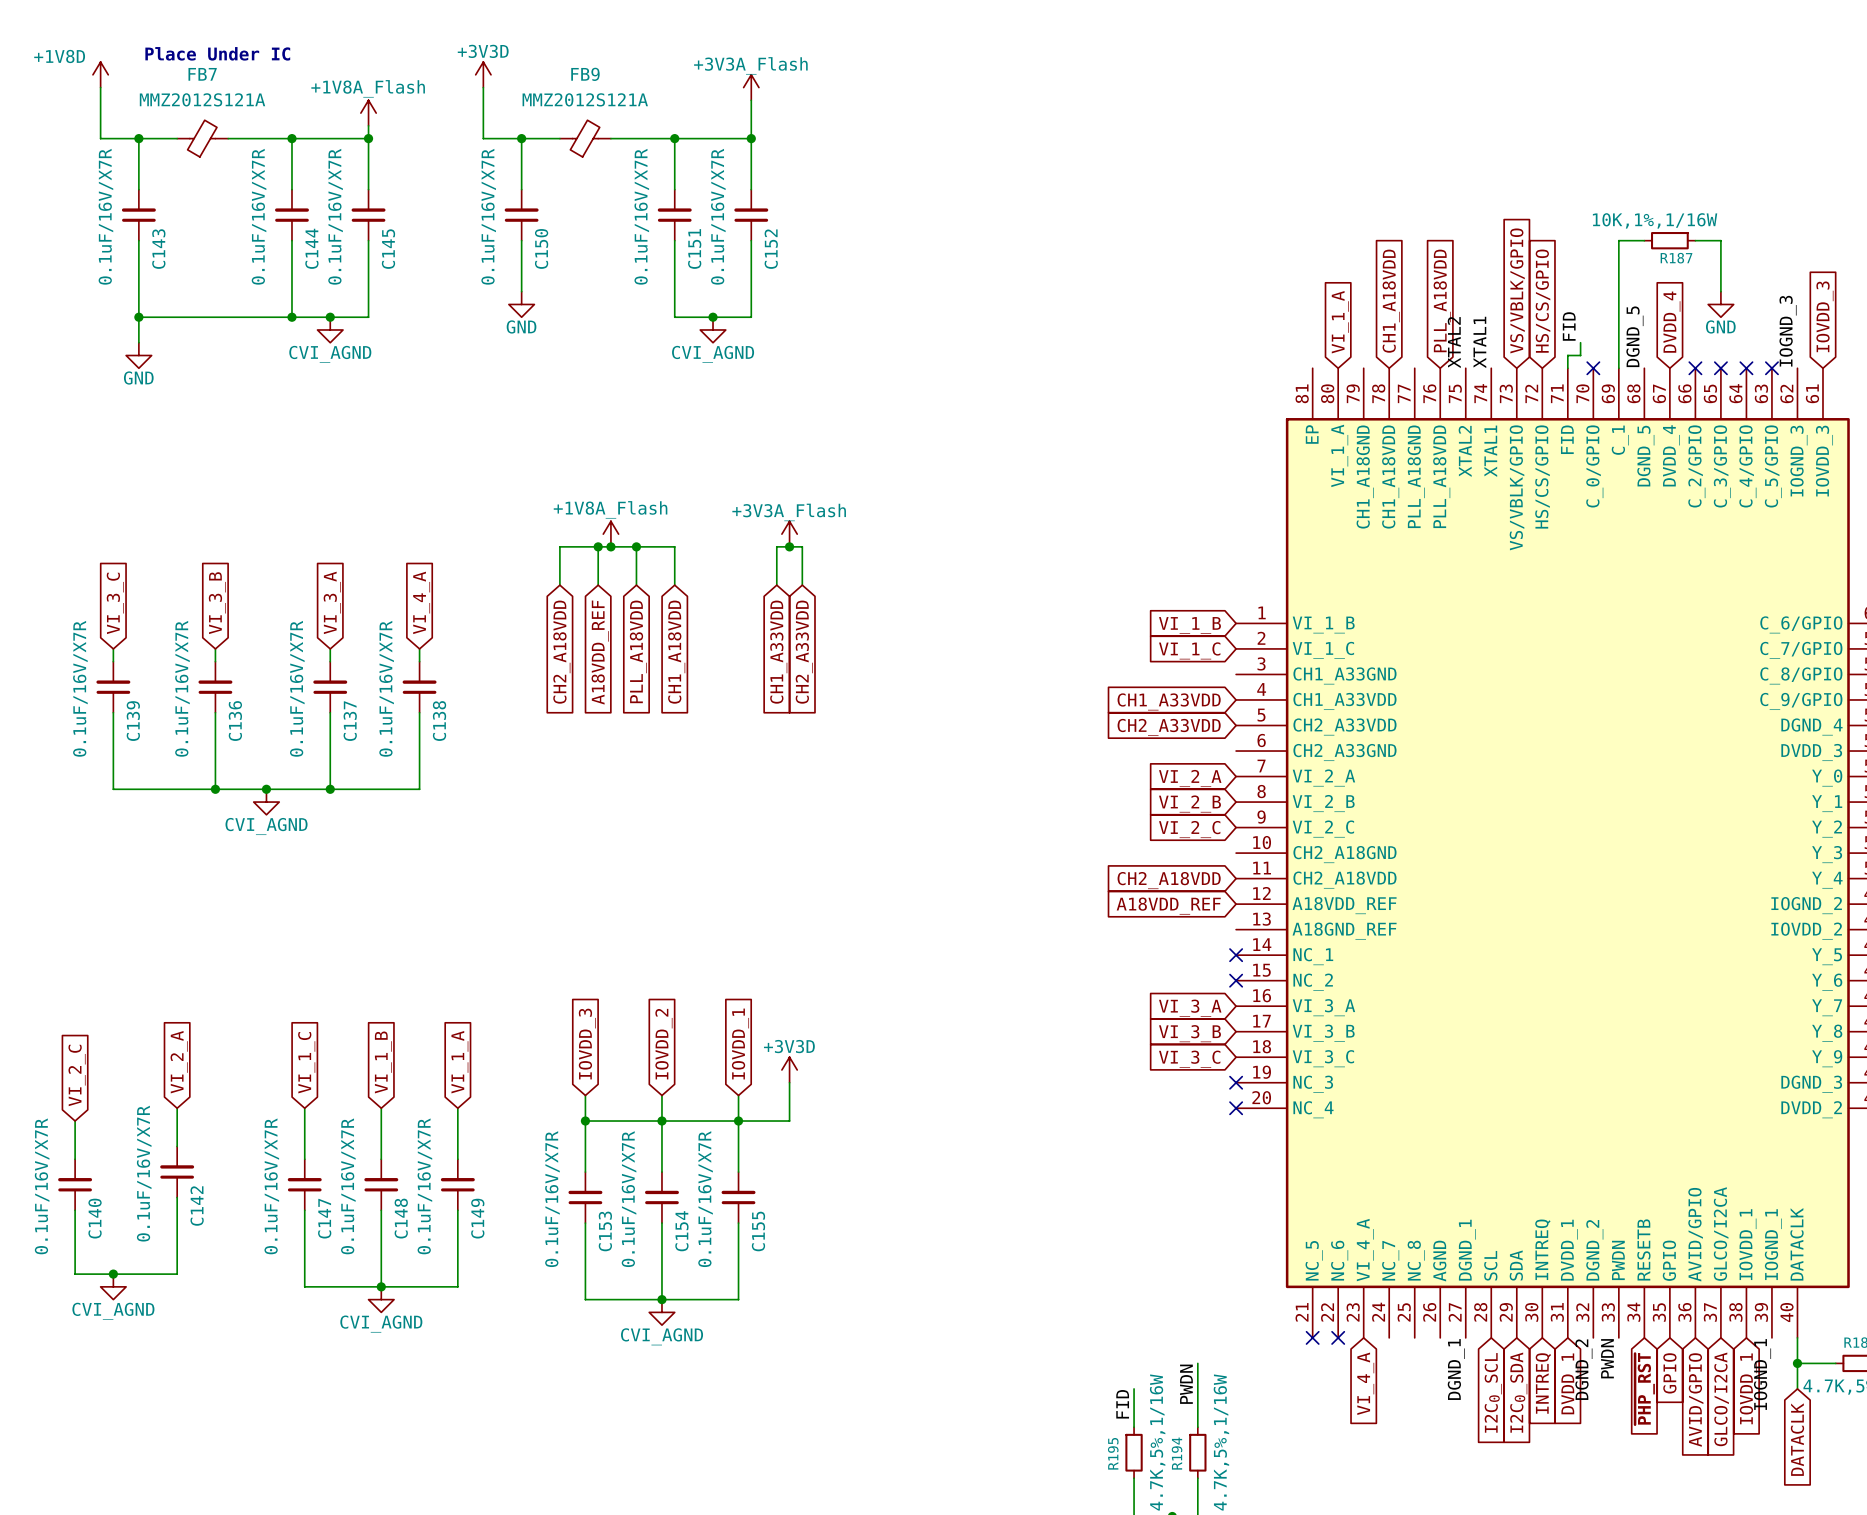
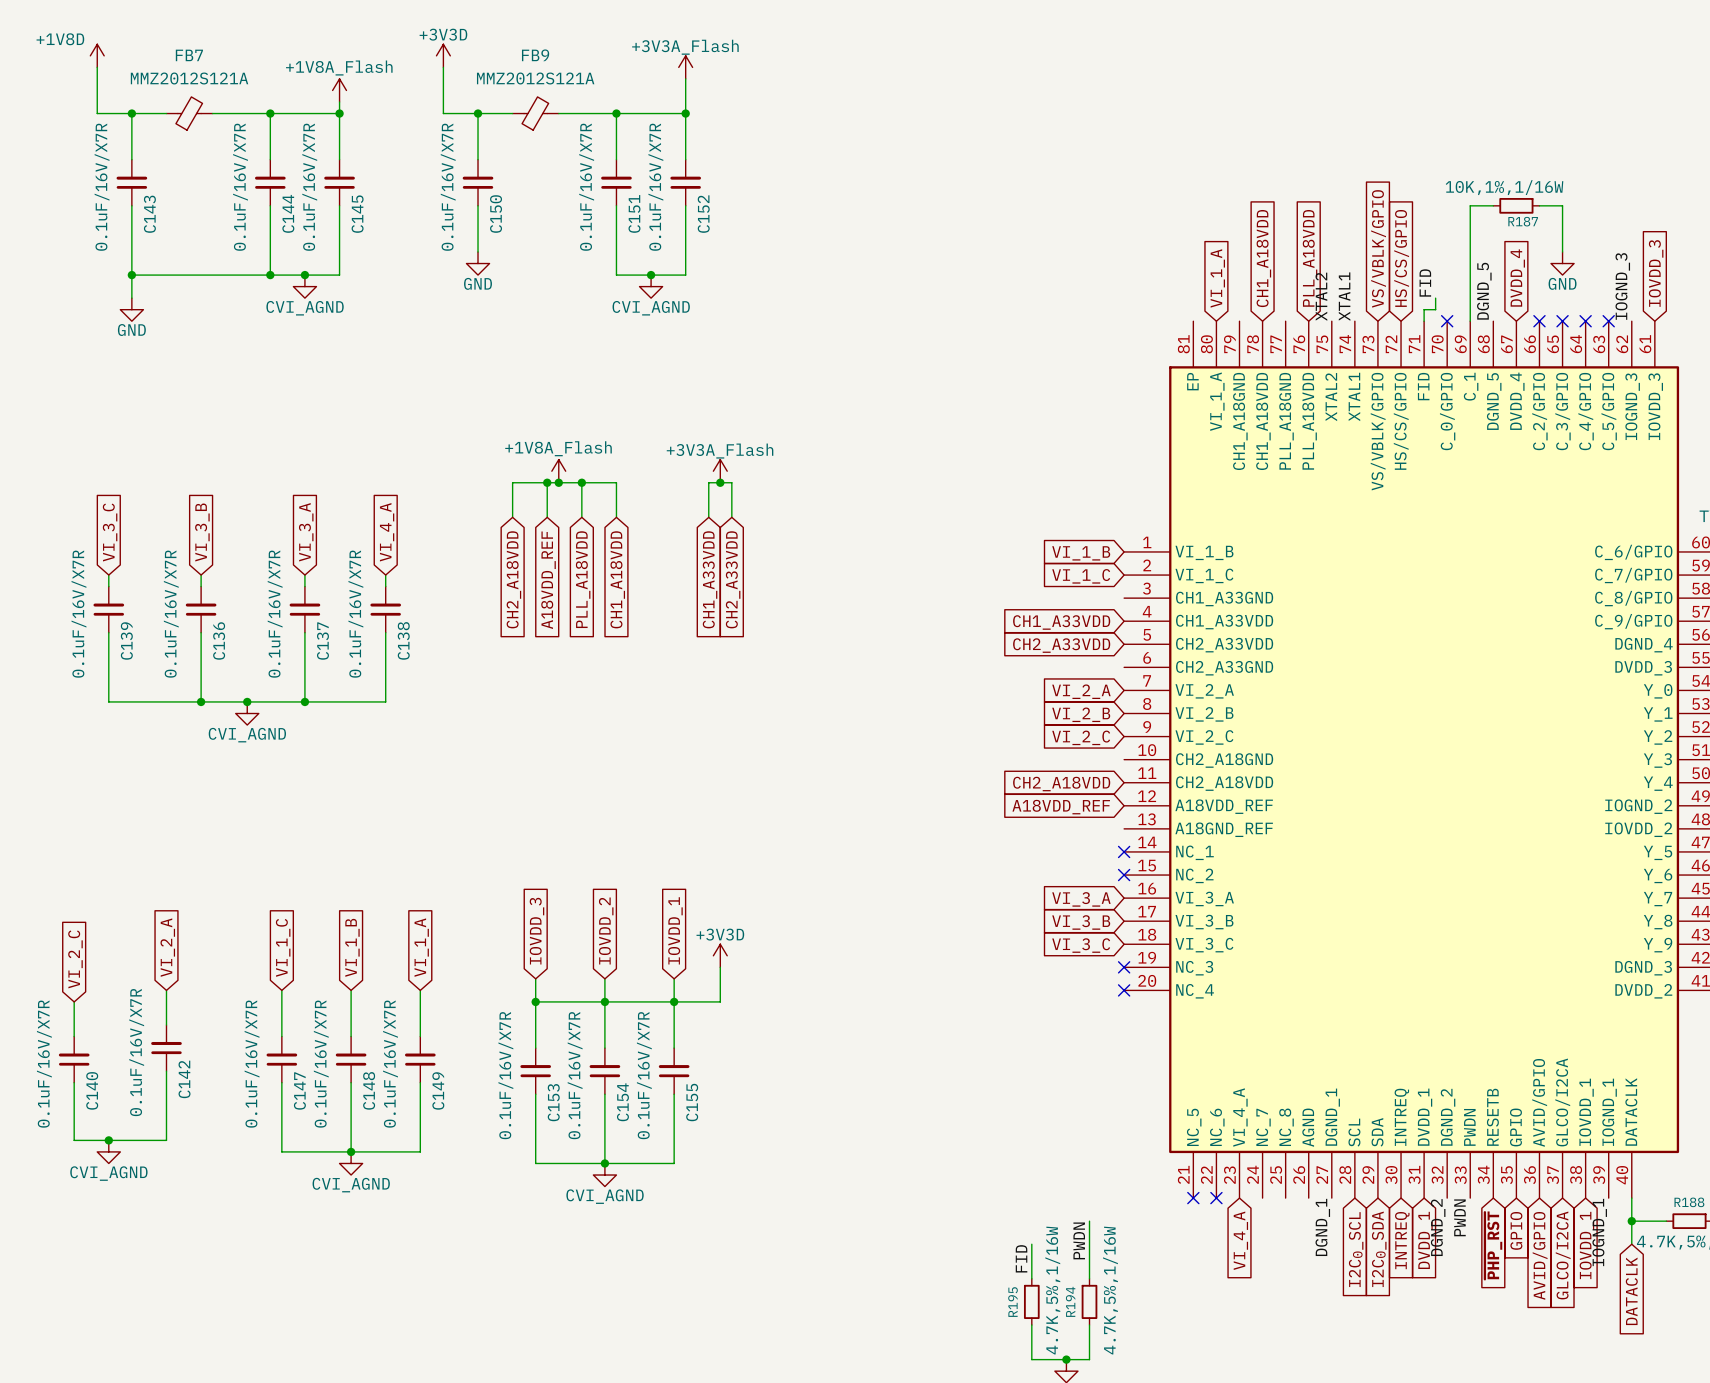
text: Place Under IC (217, 53) -> none

